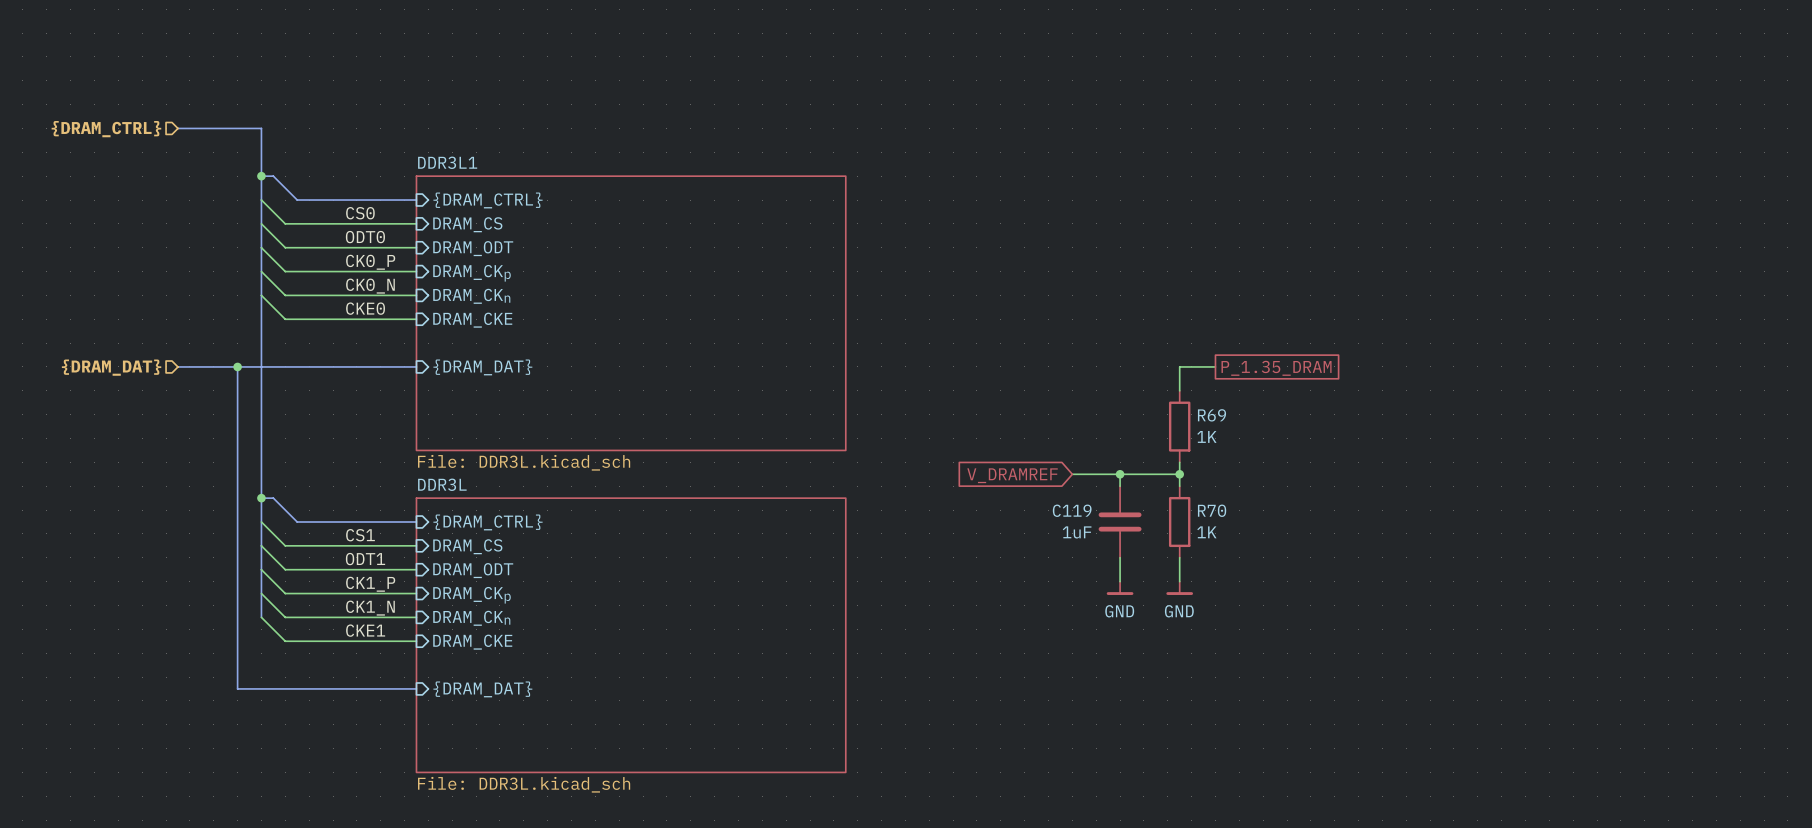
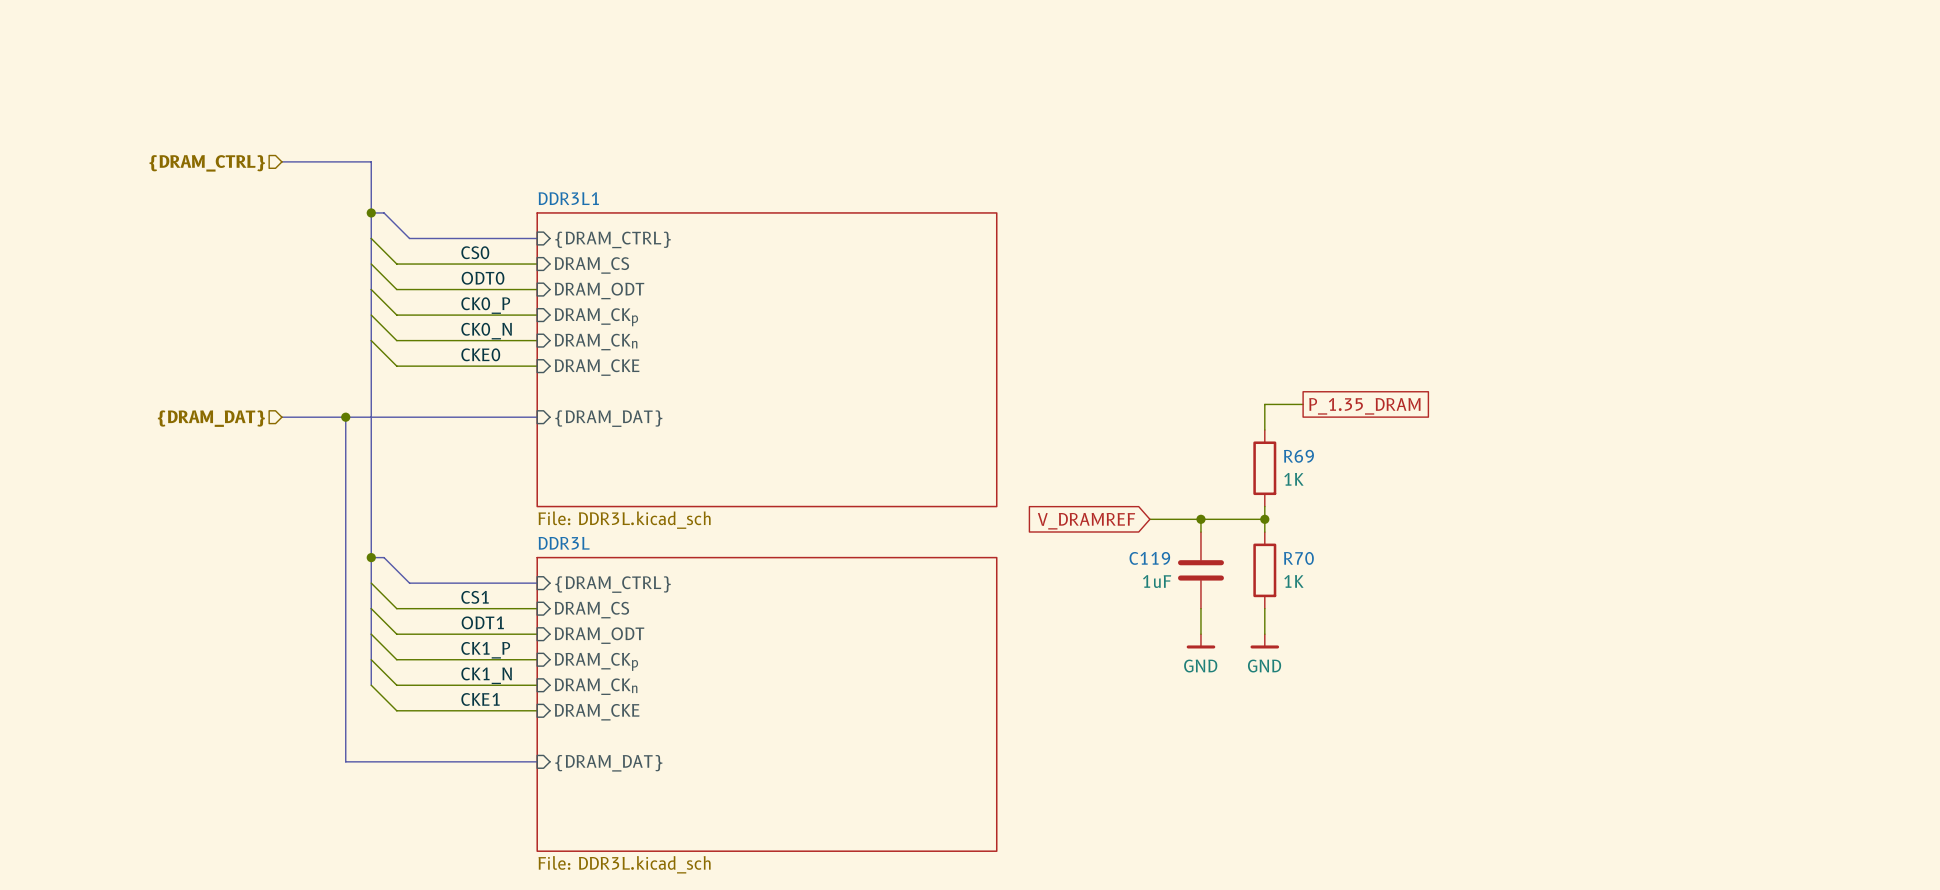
bus: (177, 128) (261, 128) (261, 617) -> (281, 161) (371, 161) (371, 685)
hierarchical label position: {DRAM_CTRL} (106, 129) -> {DRAM_CTRL} (207, 163)
bus: (261, 176) (273, 176) (297, 200) (416, 200) -> (371, 212) (384, 212) (409, 238) (537, 238)
junction: (261, 176) -> none
junction: none -> (371, 212)
wire: (261, 200) (285, 223) (416, 223) -> (371, 238) (396, 264) (537, 264)
sheet pin position: {DRAM_CTRL} (488, 200) -> {DRAM_CTRL} (613, 239)
label position: CS0 (360, 213) -> CS0 (475, 252)
wire: (261, 223) (285, 247) (416, 247) -> (371, 264) (396, 289) (537, 289)
sheet pin position: DRAM_CS (467, 224) -> DRAM_CS (591, 265)
label position: ODT0 (365, 237) -> ODT0 (483, 278)
wire: (261, 247) (285, 271) (416, 271) -> (371, 289) (396, 315) (537, 315)
sheet pin position: DRAM_ODT (473, 248) -> DRAM_ODT (599, 290)
label position: CK0_P (370, 262) -> CK0_P (485, 305)
wire: (261, 271) (285, 295) (416, 295) -> (371, 315) (396, 340) (537, 340)
sheet pin position: DRAM_CKp (472, 273) -> DRAM_CKp (596, 317)
label position: CK0_N (370, 286) -> CK0_N (486, 331)
wire: (261, 295) (285, 319) (416, 319) -> (371, 340) (396, 366) (537, 366)
sheet pin position: DRAM_CKn (471, 296) -> DRAM_CKn (596, 342)
label position: CKE0 (365, 308) -> CKE0 (480, 354)
sheet DDR3L1 position: (631, 313) -> (766, 359)
sheet pin position: DRAM_CKE (472, 320) -> DRAM_CKE (597, 367)
bus: (177, 366) (416, 366) -> (281, 417) (537, 417)
bus: (237, 366) (237, 688) (416, 688) -> (345, 417) (345, 761) (537, 761)
junction: (237, 366) -> none
hierarchical label position: {DRAM_DAT} (111, 367) -> {DRAM_DAT} (211, 418)
sheet pin position: {DRAM_DAT} (482, 367) -> {DRAM_DAT} (608, 418)
junction: none -> (345, 417)
bus: (261, 498) (273, 498) (297, 521) (416, 521) -> (371, 557) (384, 557) (409, 583) (537, 583)
junction: (261, 498) -> none
junction: none -> (371, 557)
wire: (261, 521) (285, 545) (416, 545) -> (371, 583) (396, 608) (537, 608)
sheet pin position: {DRAM_CTRL} (488, 522) -> {DRAM_CTRL} (613, 584)
label position: CS1 (360, 535) -> CS1 (475, 597)
wire: (261, 545) (285, 569) (416, 569) -> (371, 608) (396, 634) (537, 634)
sheet pin position: DRAM_CS (467, 546) -> DRAM_CS (591, 610)
label position: ODT1 (365, 559) -> ODT1 (482, 622)
wire: (261, 569) (285, 593) (416, 593) -> (371, 634) (396, 659) (537, 659)
sheet pin position: DRAM_ODT (473, 570) -> DRAM_ODT (599, 635)
label position: CK1_P (370, 584) -> CK1_P (485, 650)
wire: (261, 593) (285, 617) (416, 617) -> (371, 659) (396, 685) (537, 685)
sheet pin position: DRAM_CKp (472, 595) -> DRAM_CKp (596, 661)
label position: CK1_N (370, 608) -> CK1_N (486, 675)
wire: (261, 617) (285, 641) (416, 641) -> (371, 685) (396, 710) (537, 710)
sheet pin position: DRAM_CKn (471, 618) -> DRAM_CKn (596, 686)
label position: CKE1 (365, 630) -> CKE1 (480, 699)
sheet DDR3L position: (631, 635) -> (766, 704)
sheet pin position: DRAM_CKE (472, 642) -> DRAM_CKE (597, 712)
sheet pin position: {DRAM_DAT} (482, 689) -> {DRAM_DAT} (608, 763)

